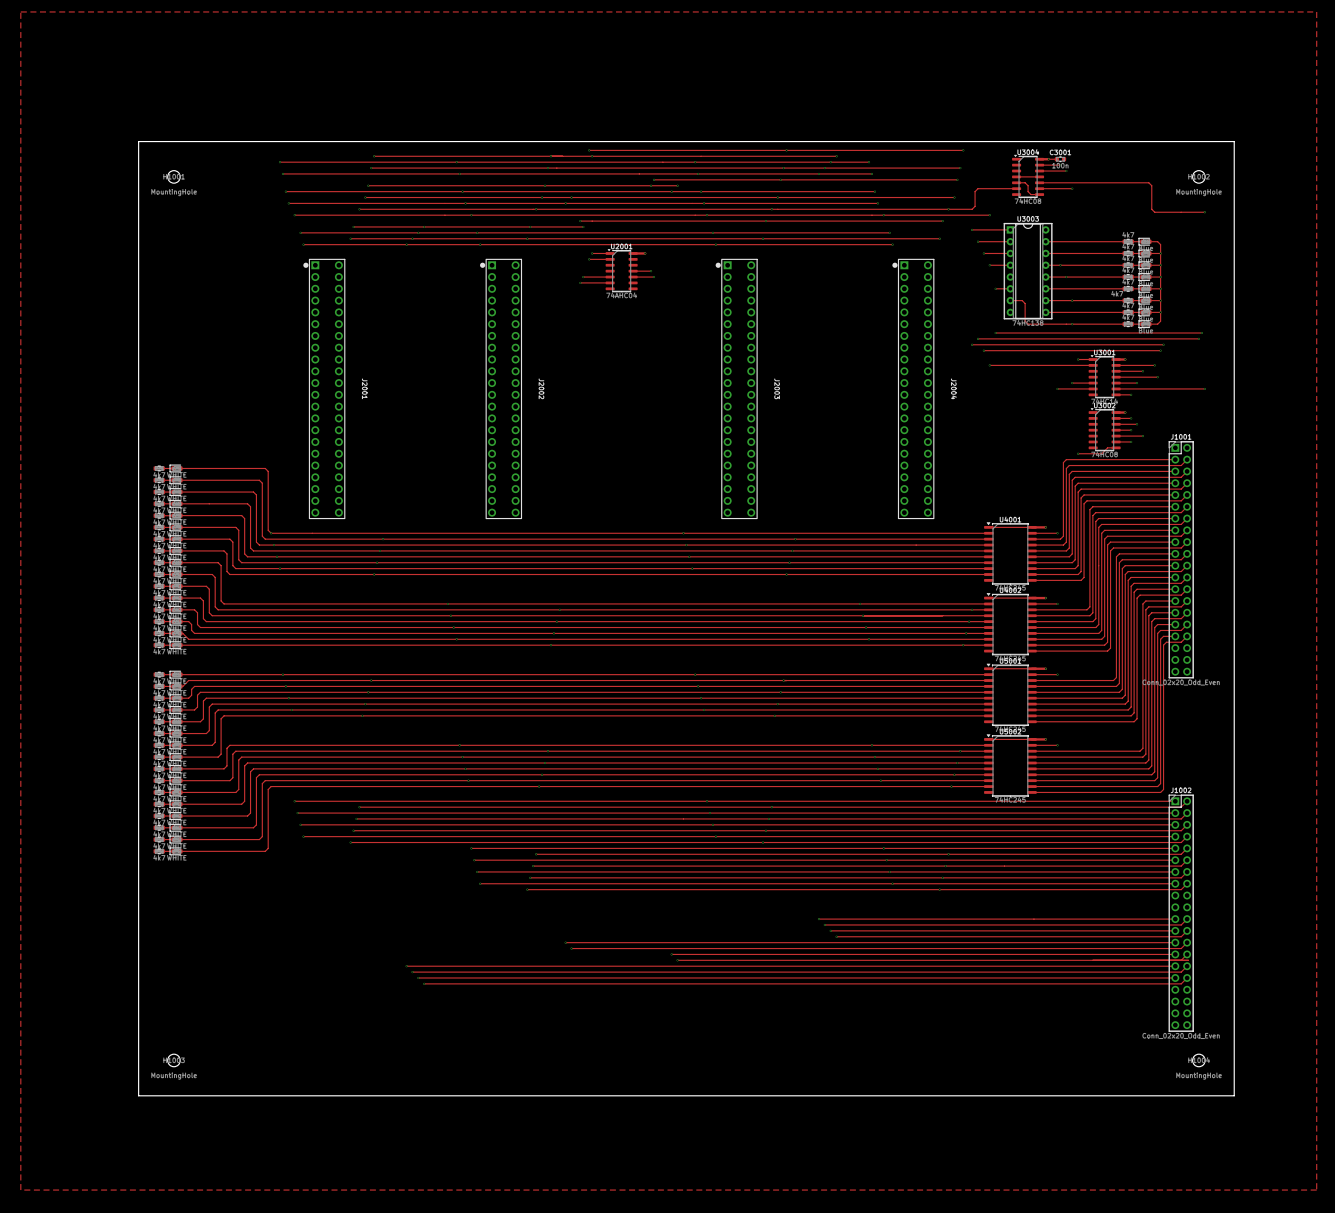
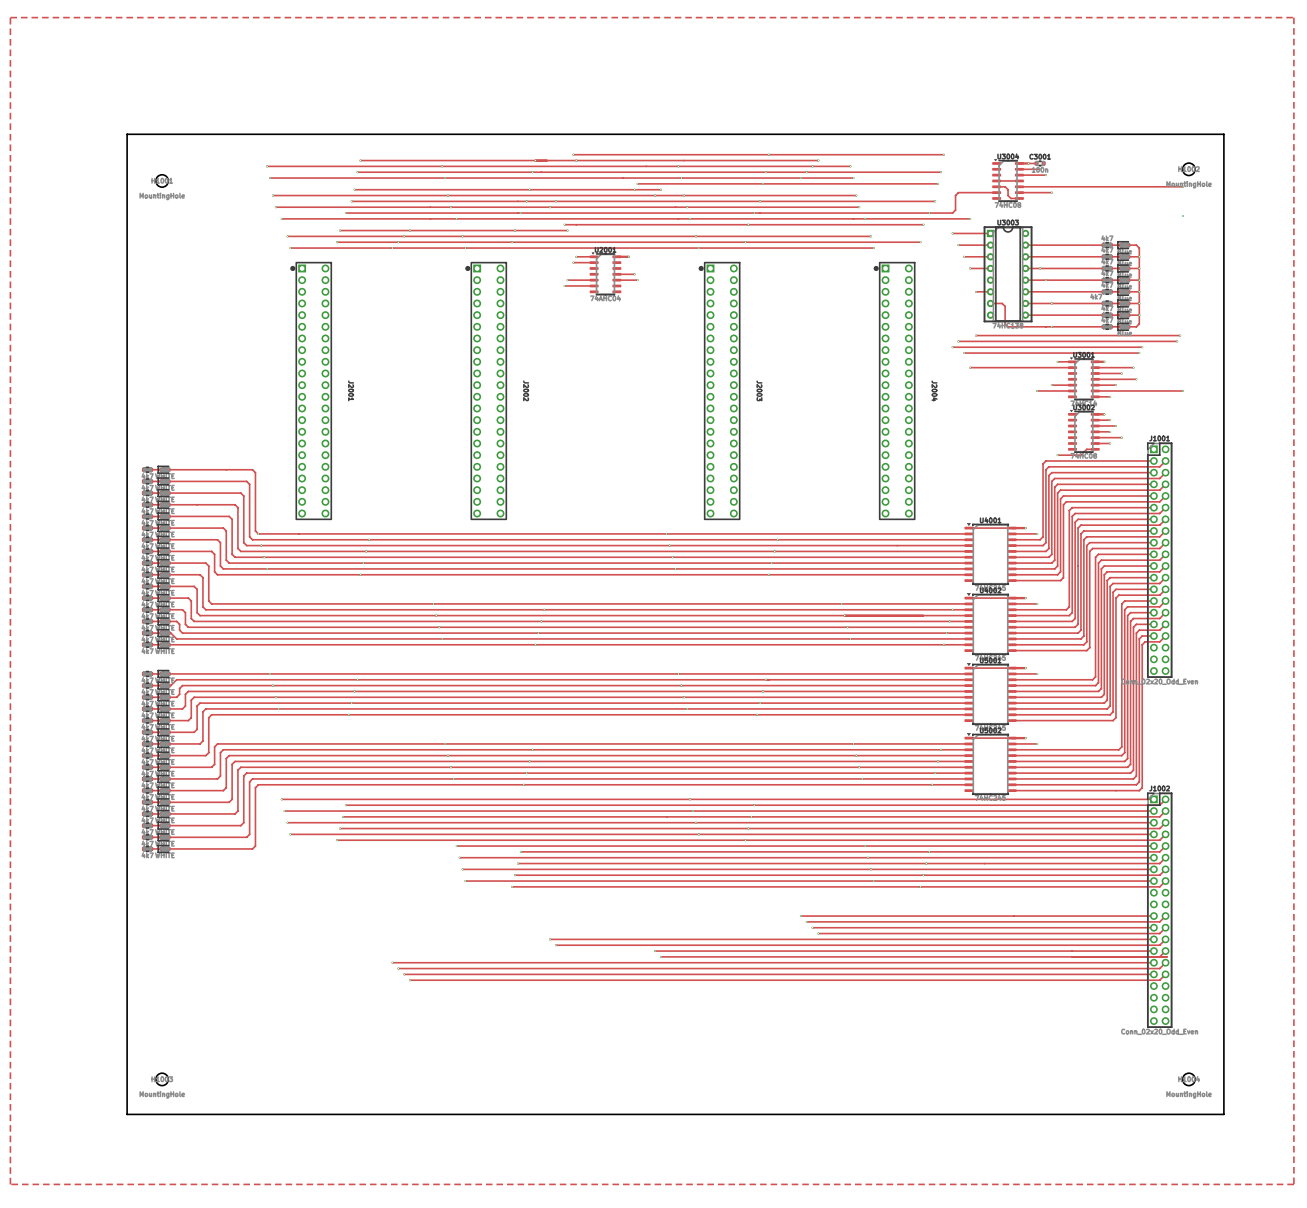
board edge: (138, 141) (1234, 141) (1234, 1095) (138, 1095) -> (127, 145) (127, 134) (1223, 134) (1223, 1114) (127, 1114) (127, 1091)
part position: (1198, 176) -> (1188, 169)
track: (1148, 182) (1151, 185) (1151, 209) (1154, 212) (1204, 212) -> (1127, 186) (1183, 186)
via: none -> (1183, 186)
part position: (173, 1060) -> (162, 1079)
part position: (1198, 1060) -> (1188, 1079)

